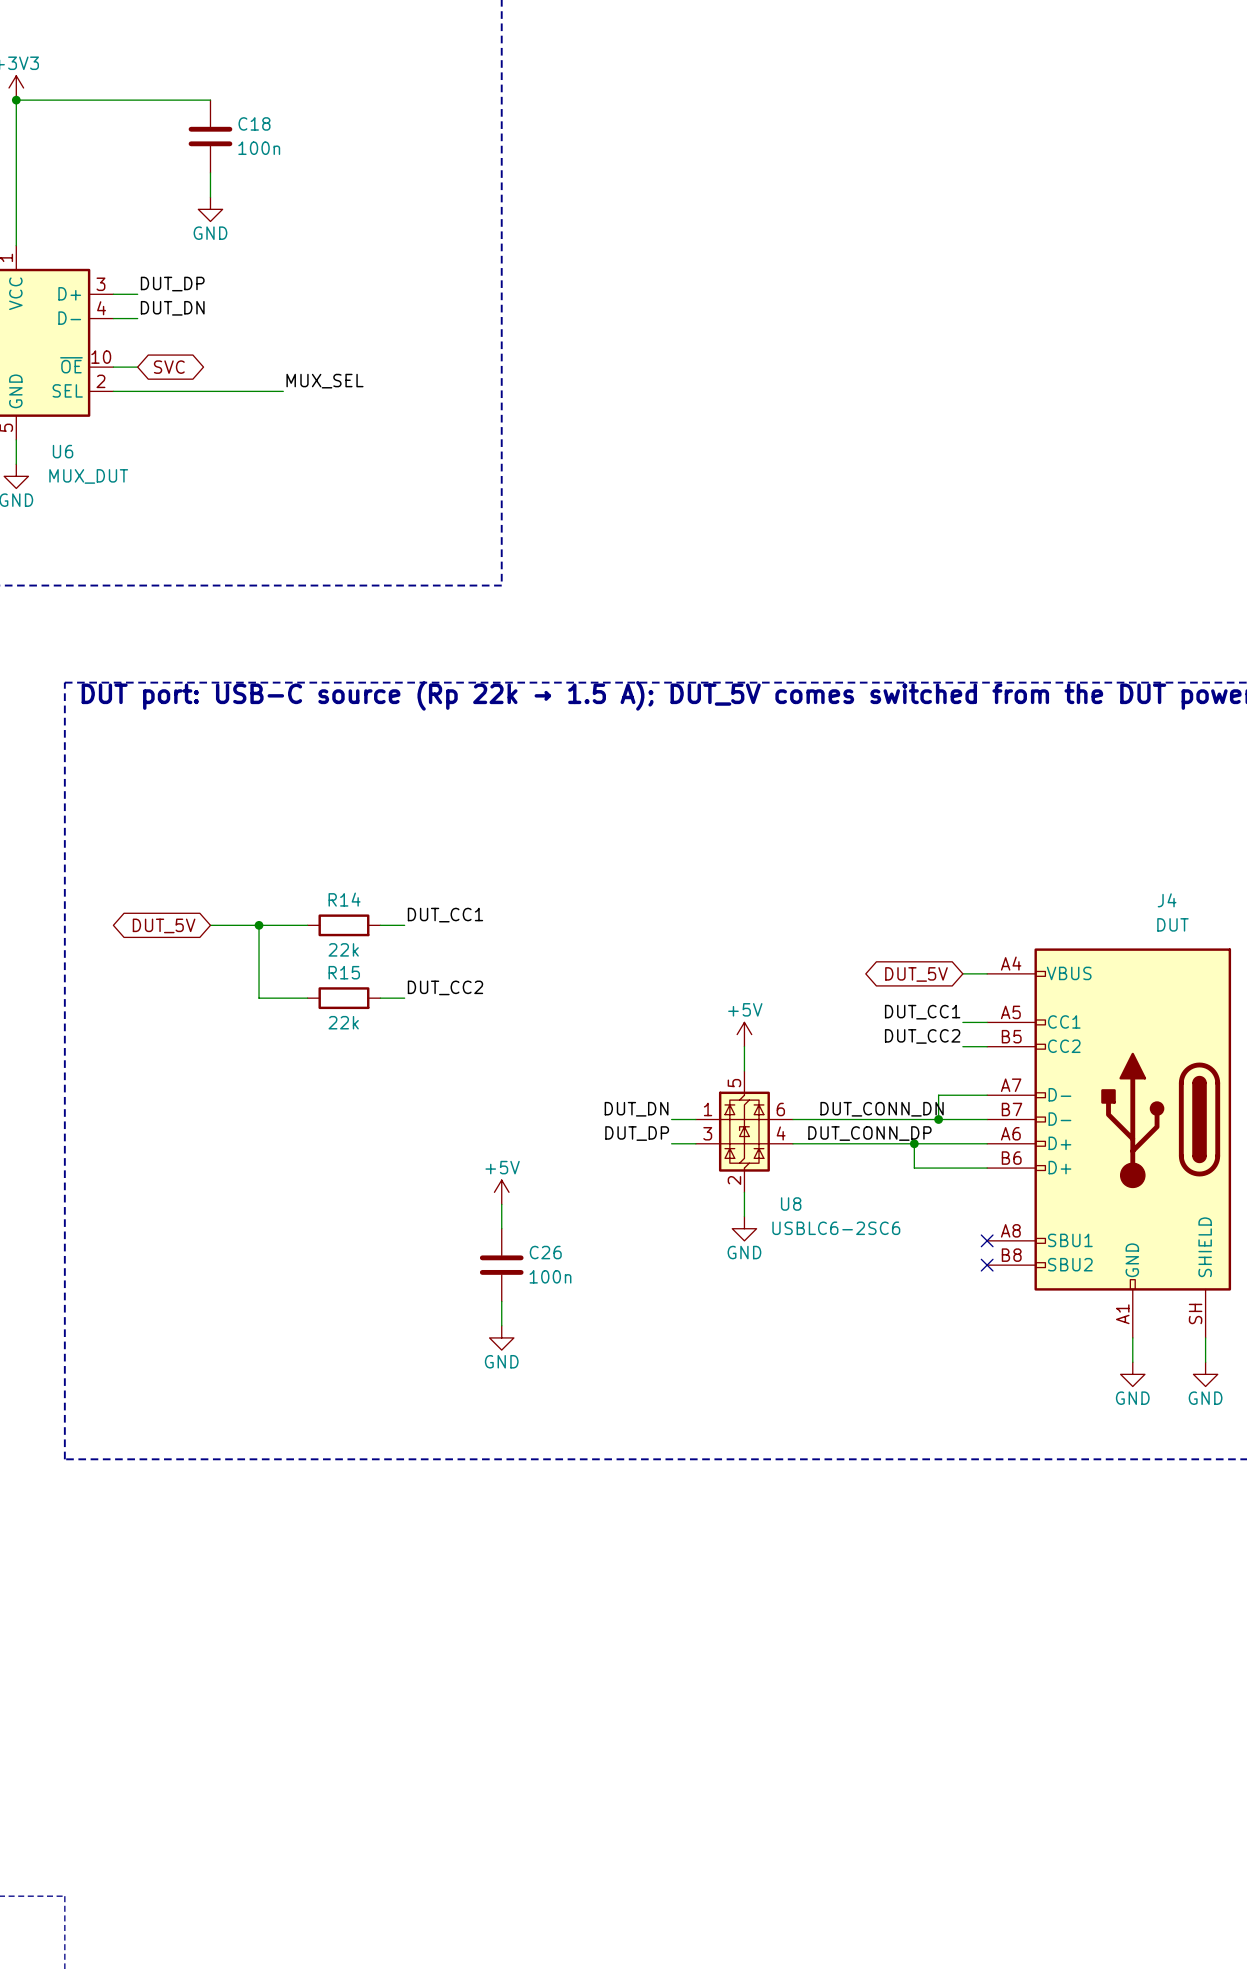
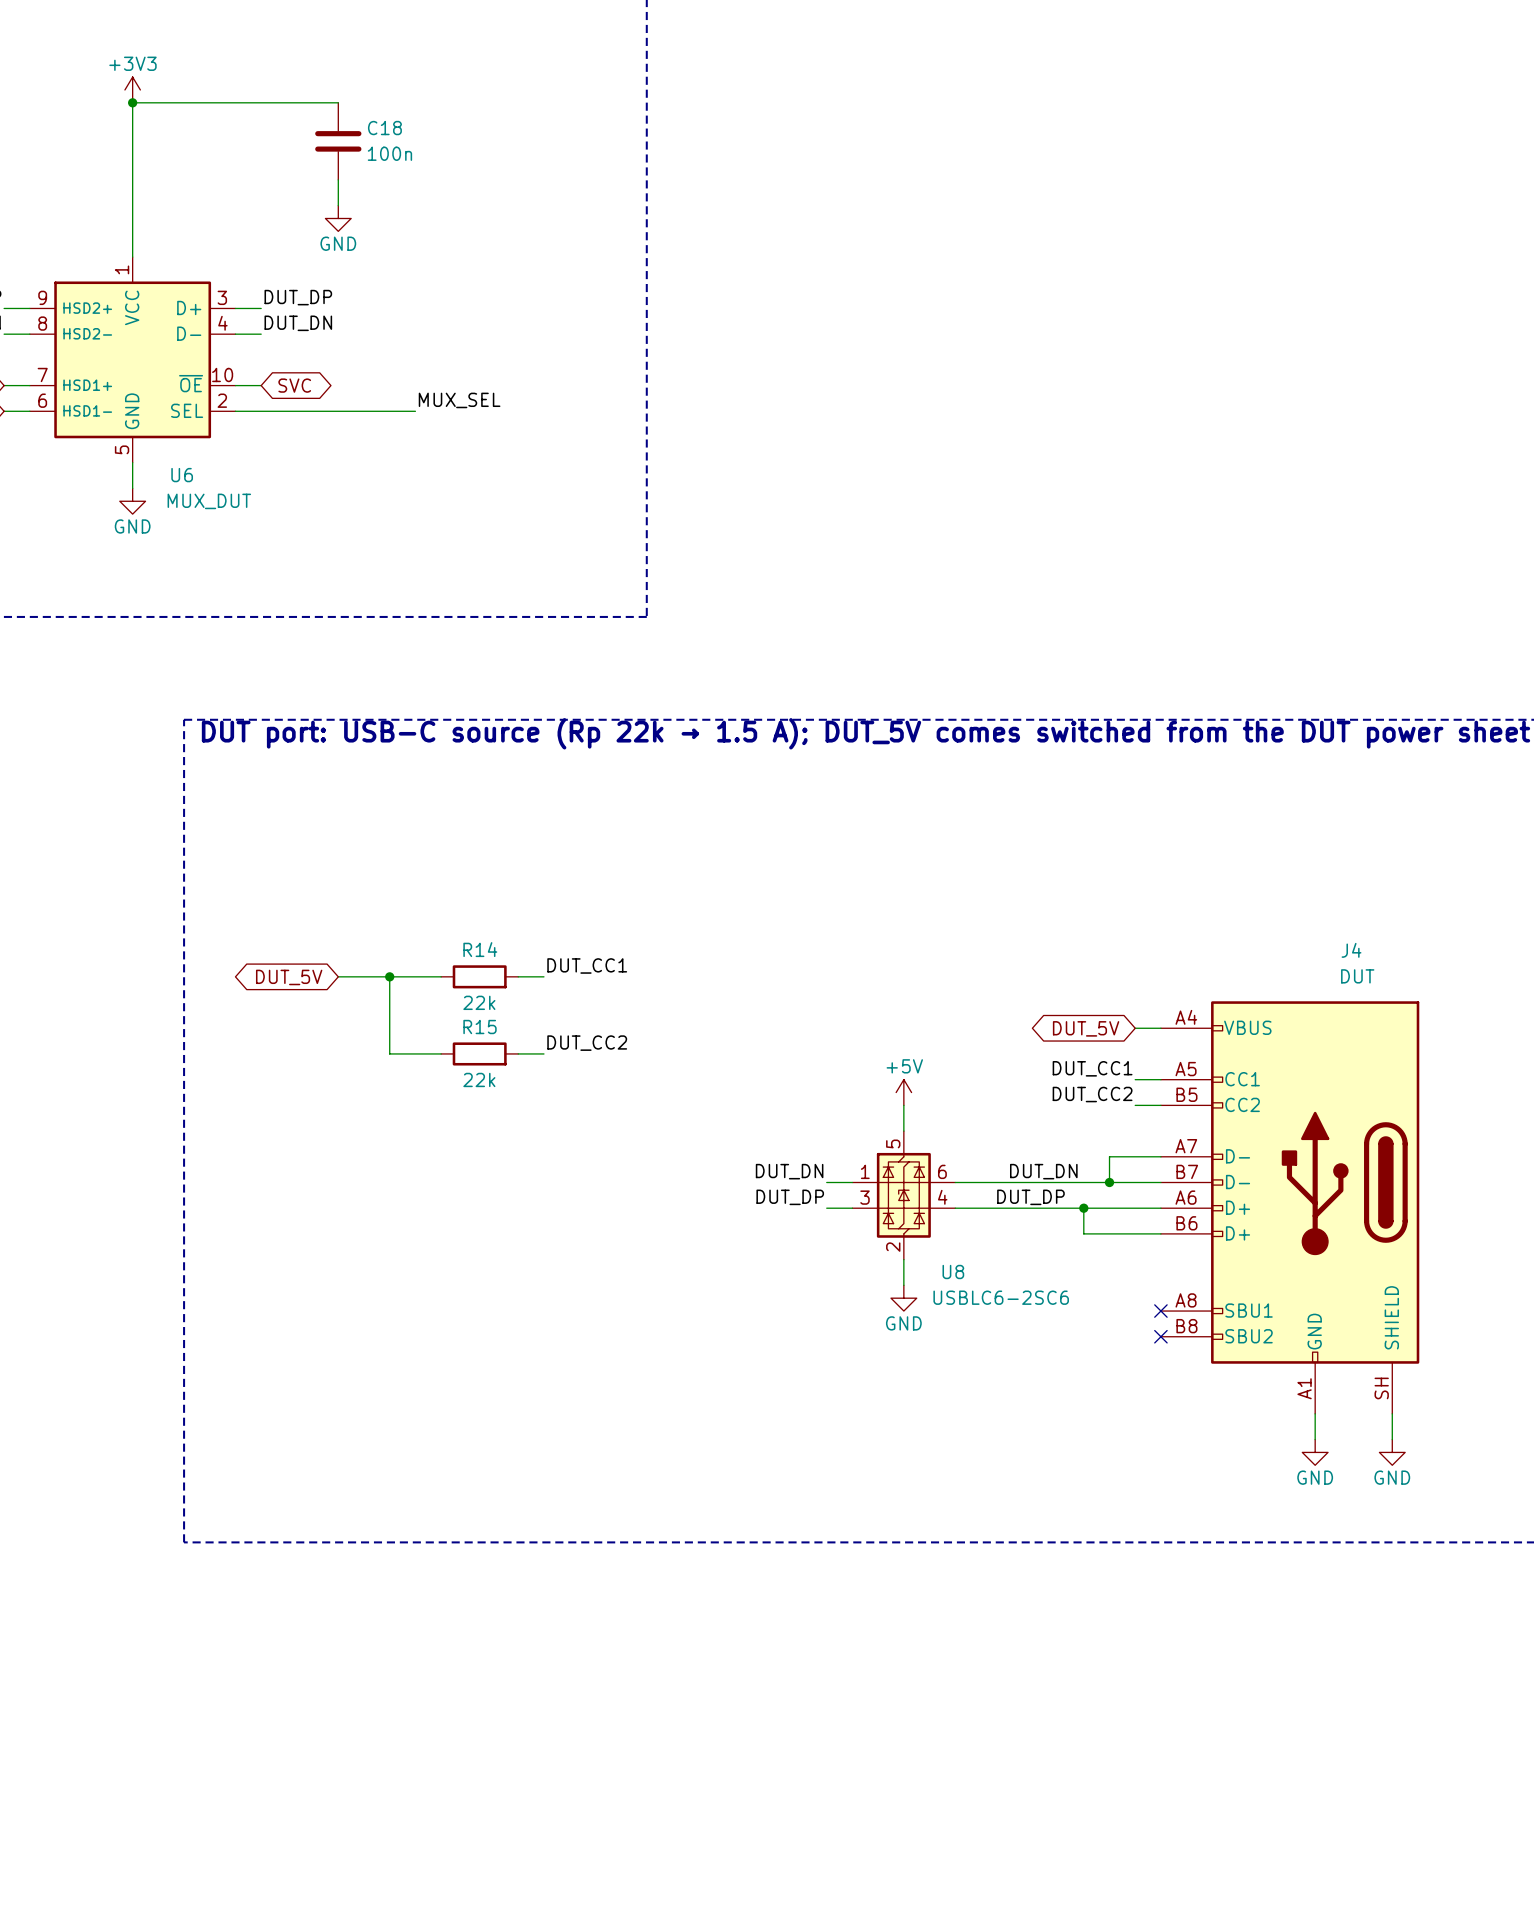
label: DUT_CONN_DN (882, 1109) -> DUT_DN (1043, 1171)
label: DUT_CONN_DP (869, 1133) -> DUT_DP (1030, 1197)
power symbol: +5V (501, 1192) -> none
wire: (501, 1204) (501, 1228) -> none
C26: 100n (501, 1265) -> none
wire: (501, 1301) (501, 1325) -> none
power symbol: GND (501, 1337) -> none

